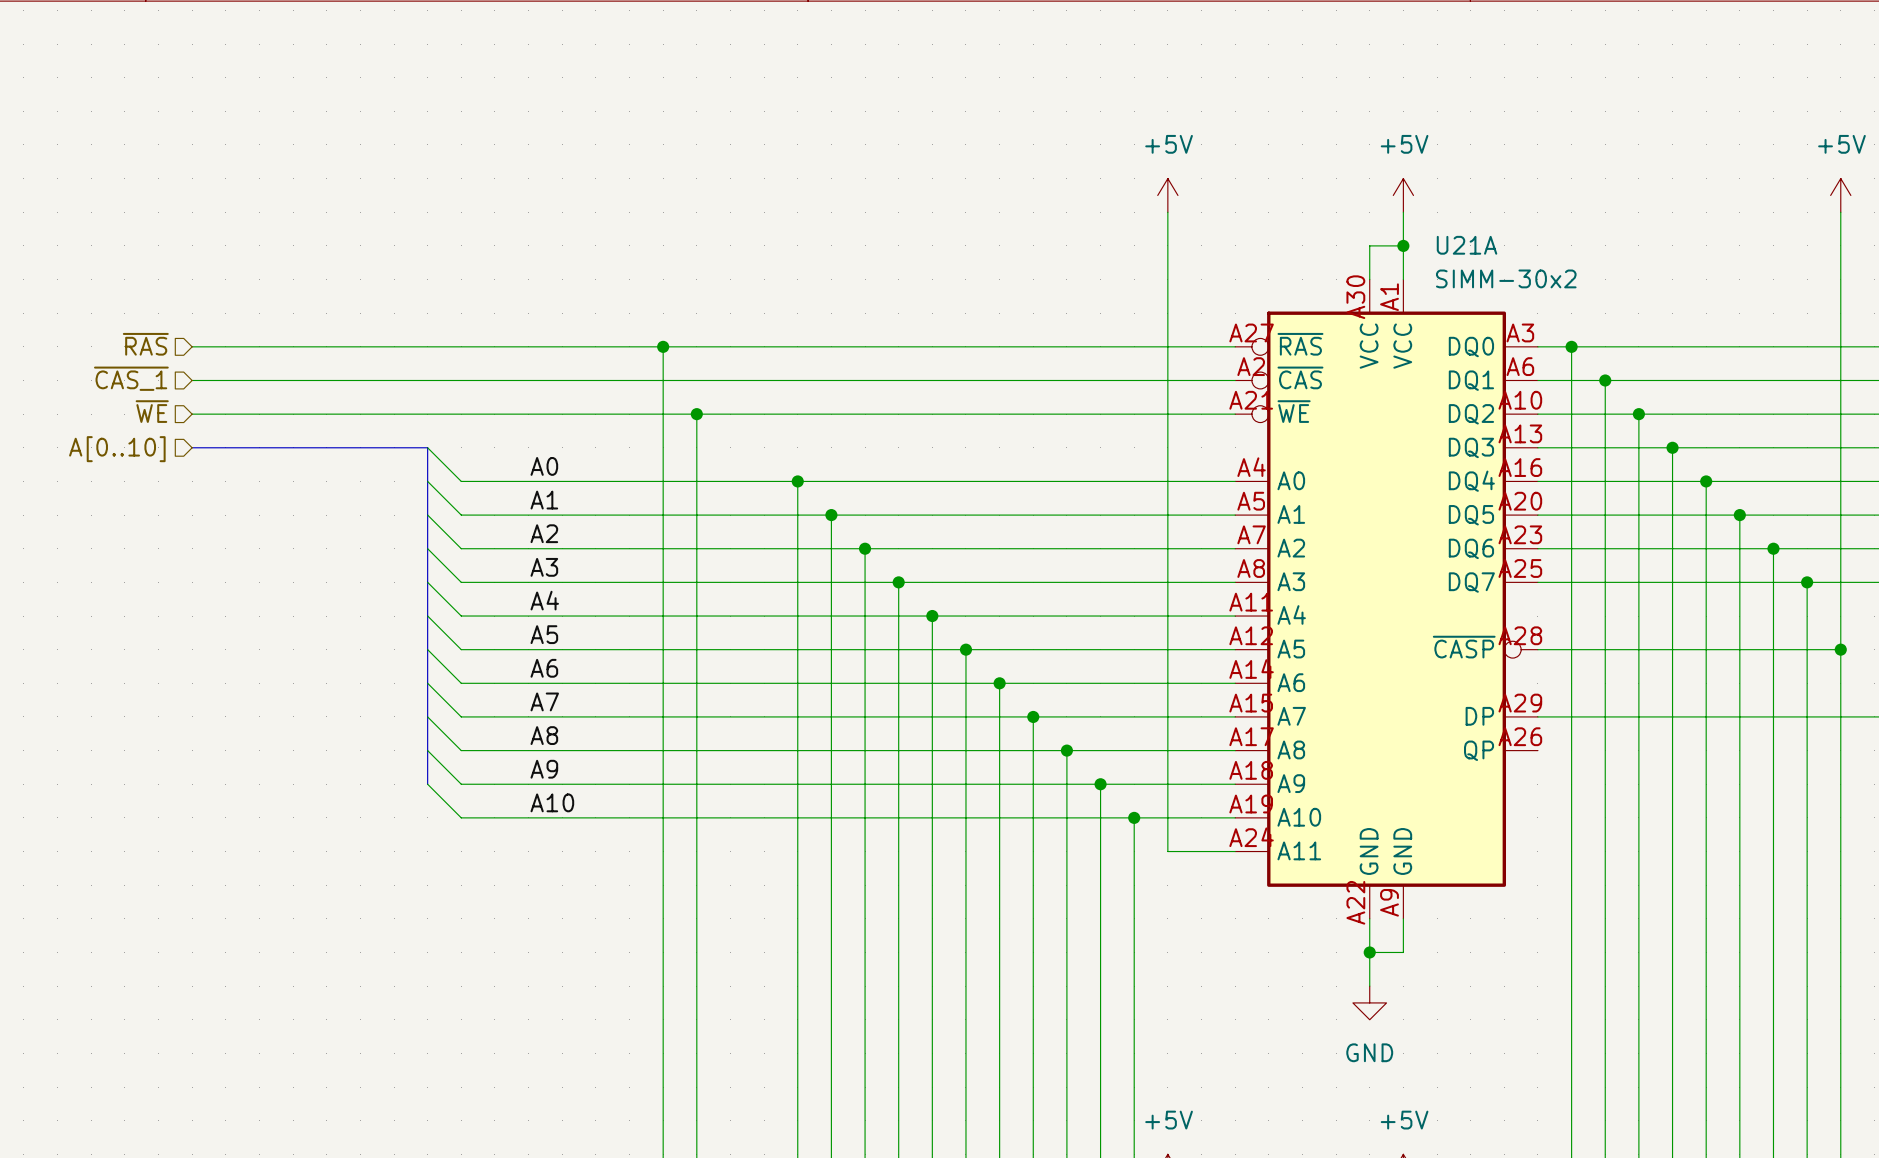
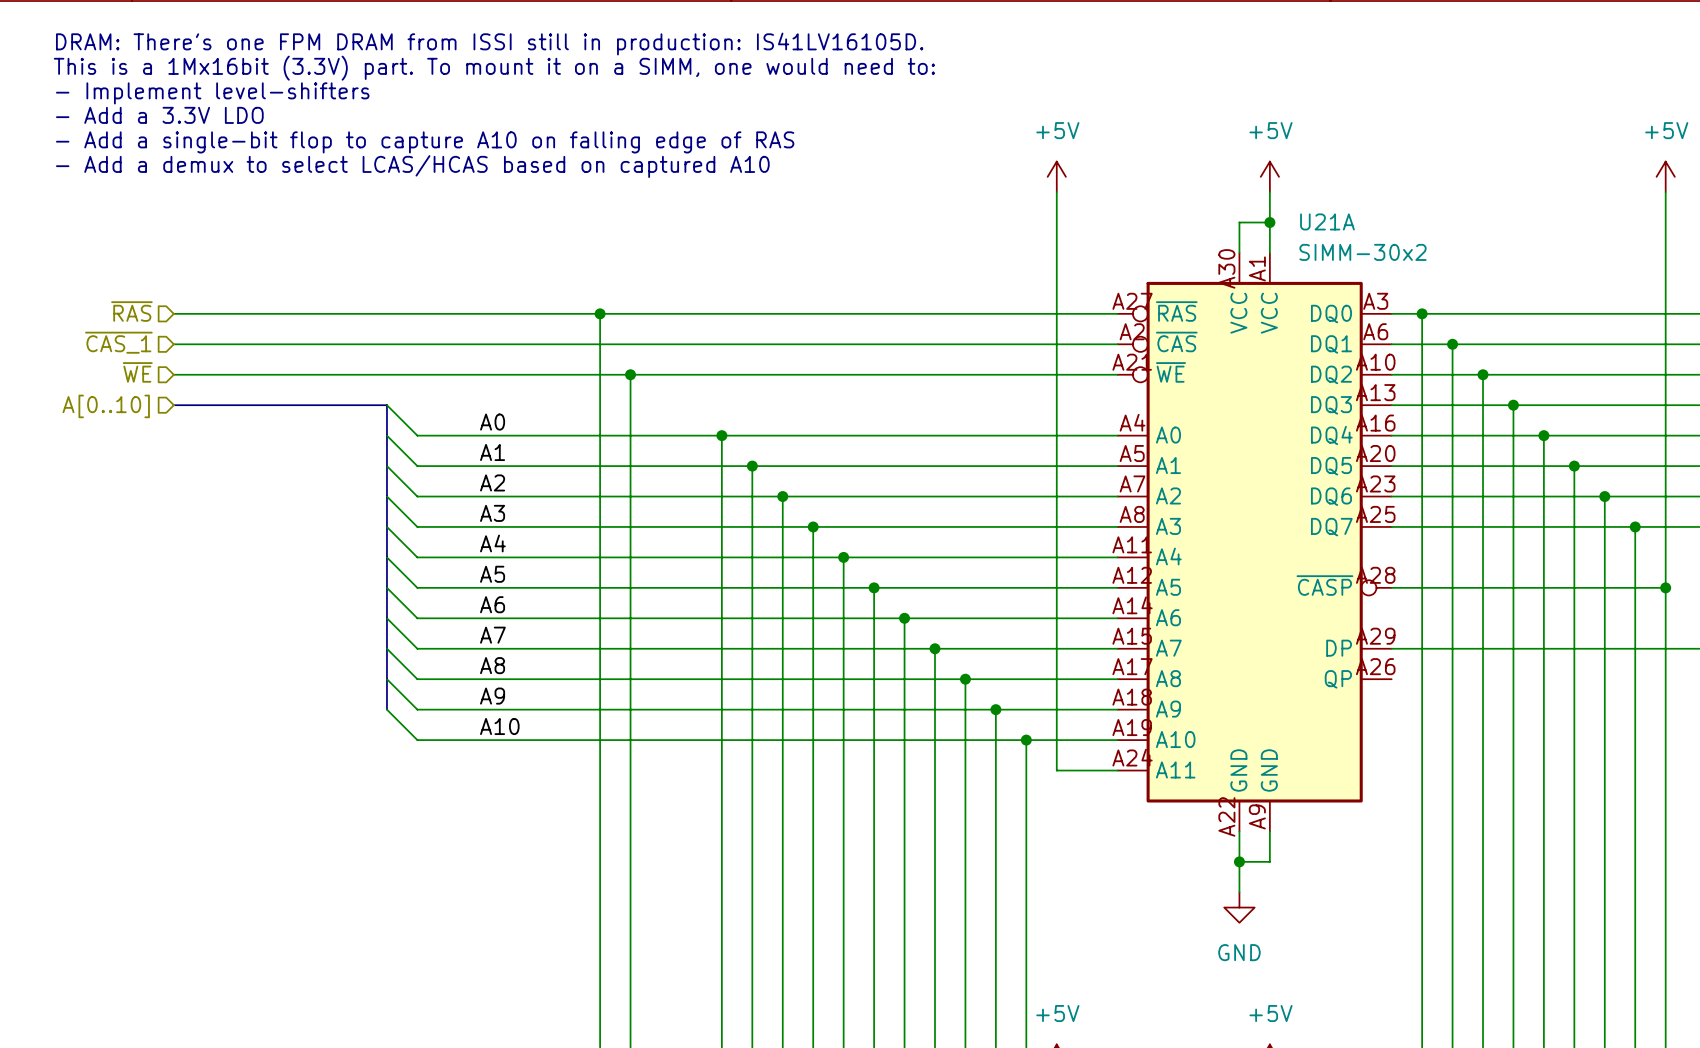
text: none -> DRAM: There's one FPM DRAM from ISSI still in production: IS41LV16105D. (489, 44)
text: none -> This is a 1Mx16bit (3.3V) part. To mount it on a SIMM, one would need to: (494, 68)
text: none -> - Implement level-shifters (212, 93)
text: none -> - Add a 3.3V LDO (159, 115)
text: none -> - Add a single-bit flop to capture A10 on falling edge of RAS (425, 142)
text: none -> - Add a demux to select LCAS/HCAS based on captured A10 (412, 166)

